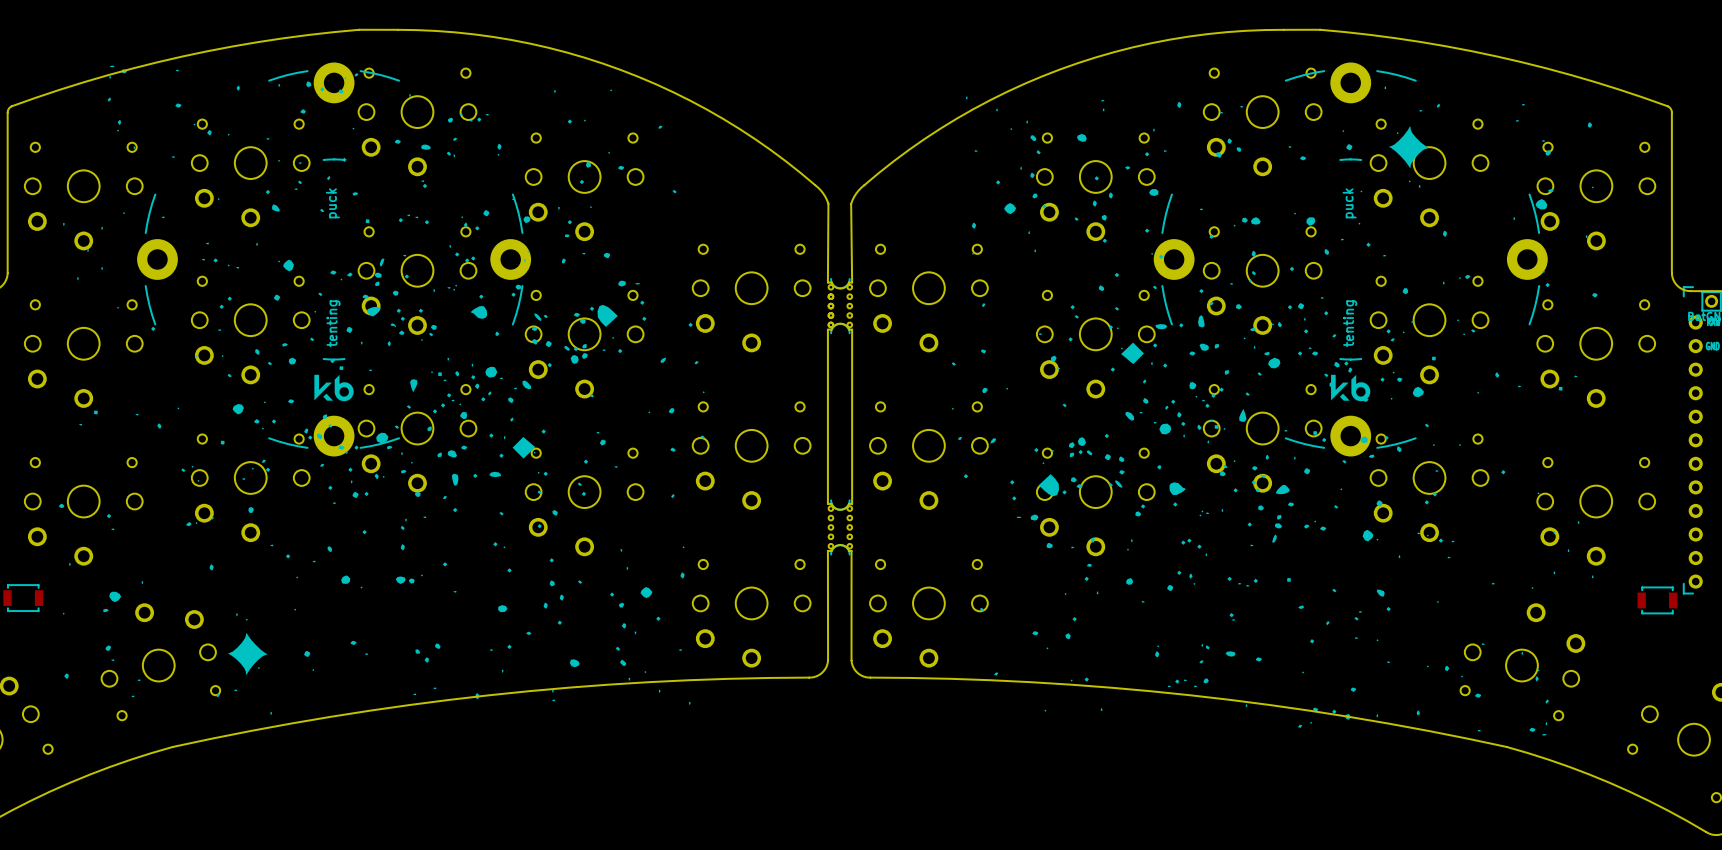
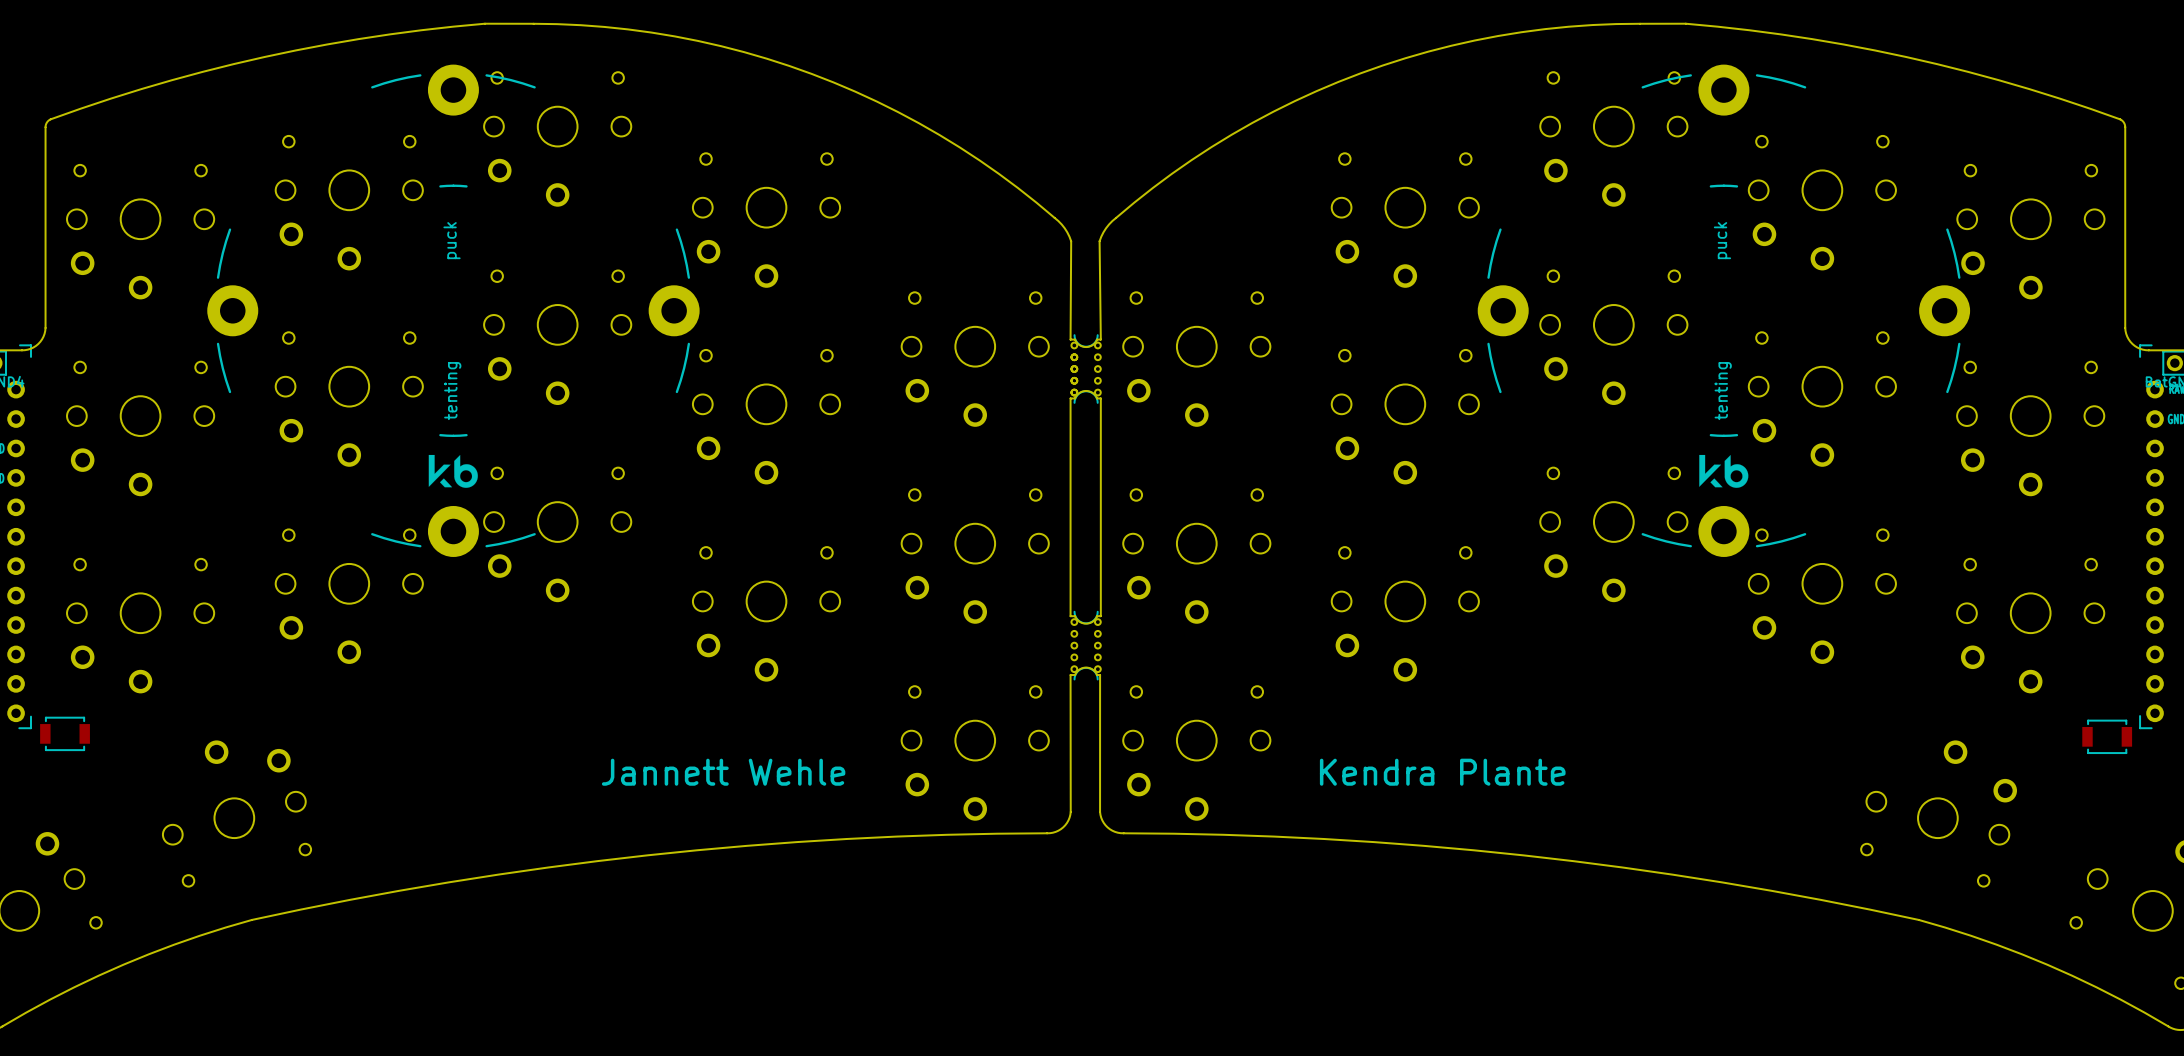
drawing: [59, 65, 705, 715] -> none
drawing: [951, 86, 1598, 736] -> none
text: none -> Jannett Wehle (723, 772)
text: none -> Kendra Plante (1442, 772)

